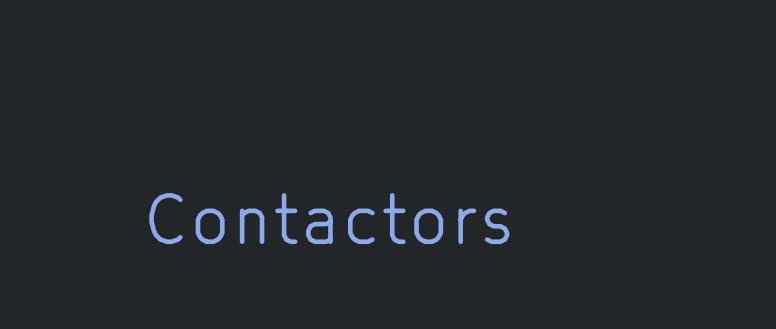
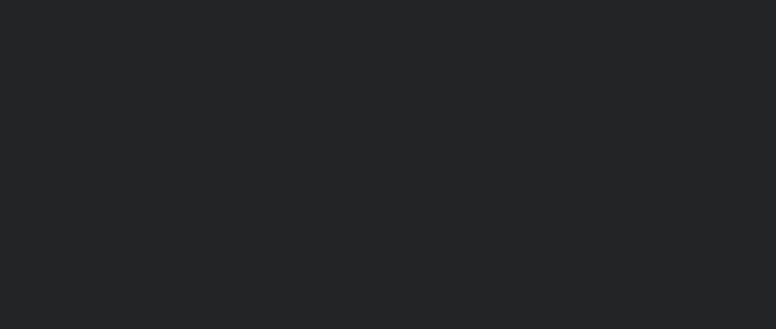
text: Contactors (329, 218) -> none

